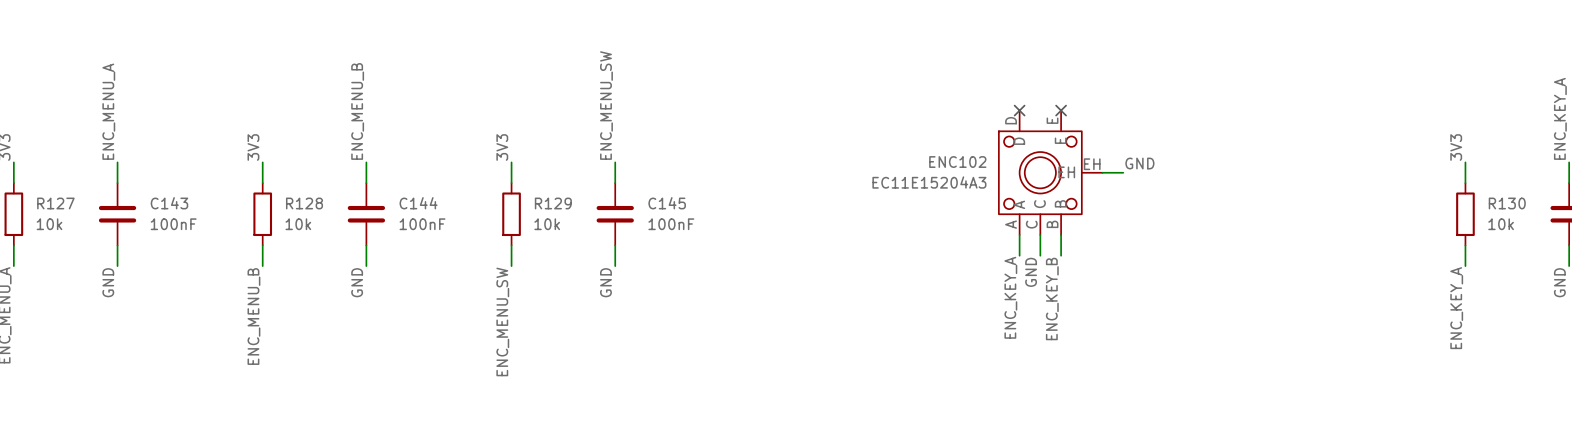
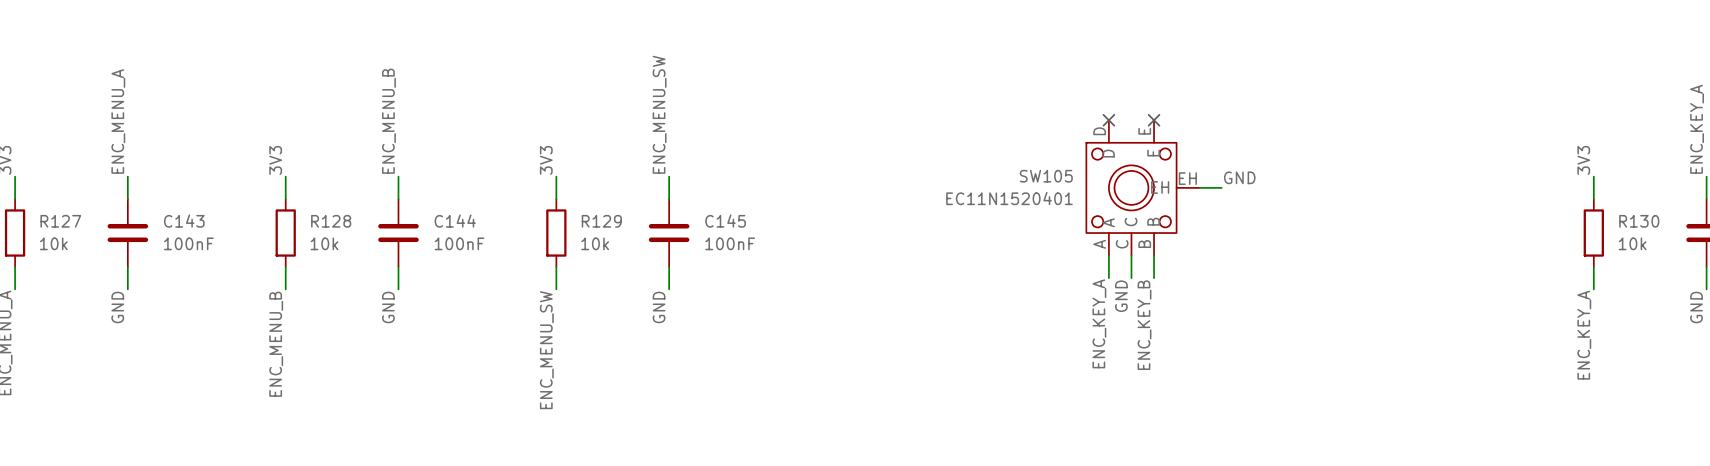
ENC102 name: ENC102 (957, 162) -> SW105 (1046, 176)
ENC102 value: EC11E15204A3 (929, 182) -> EC11N1520401 (1009, 198)

